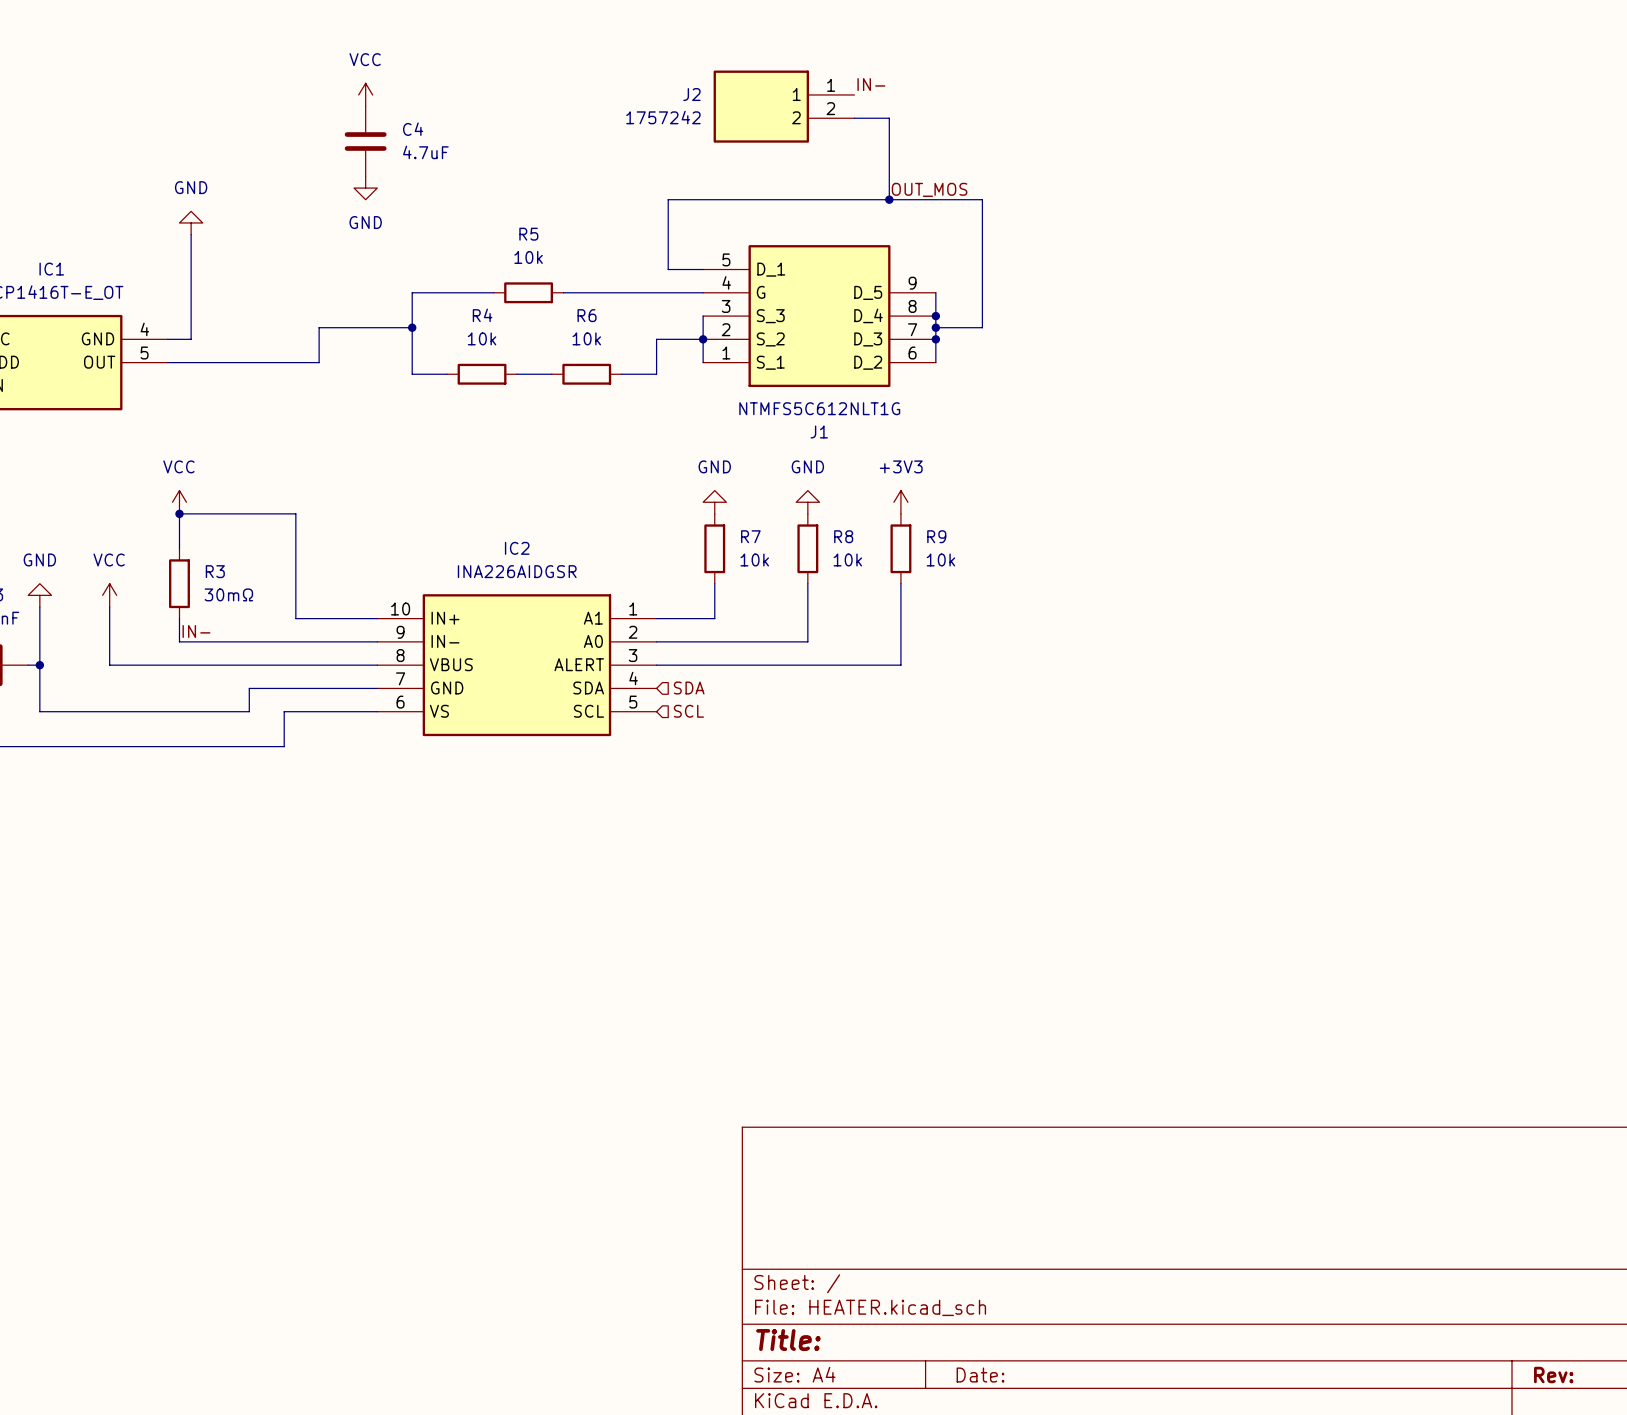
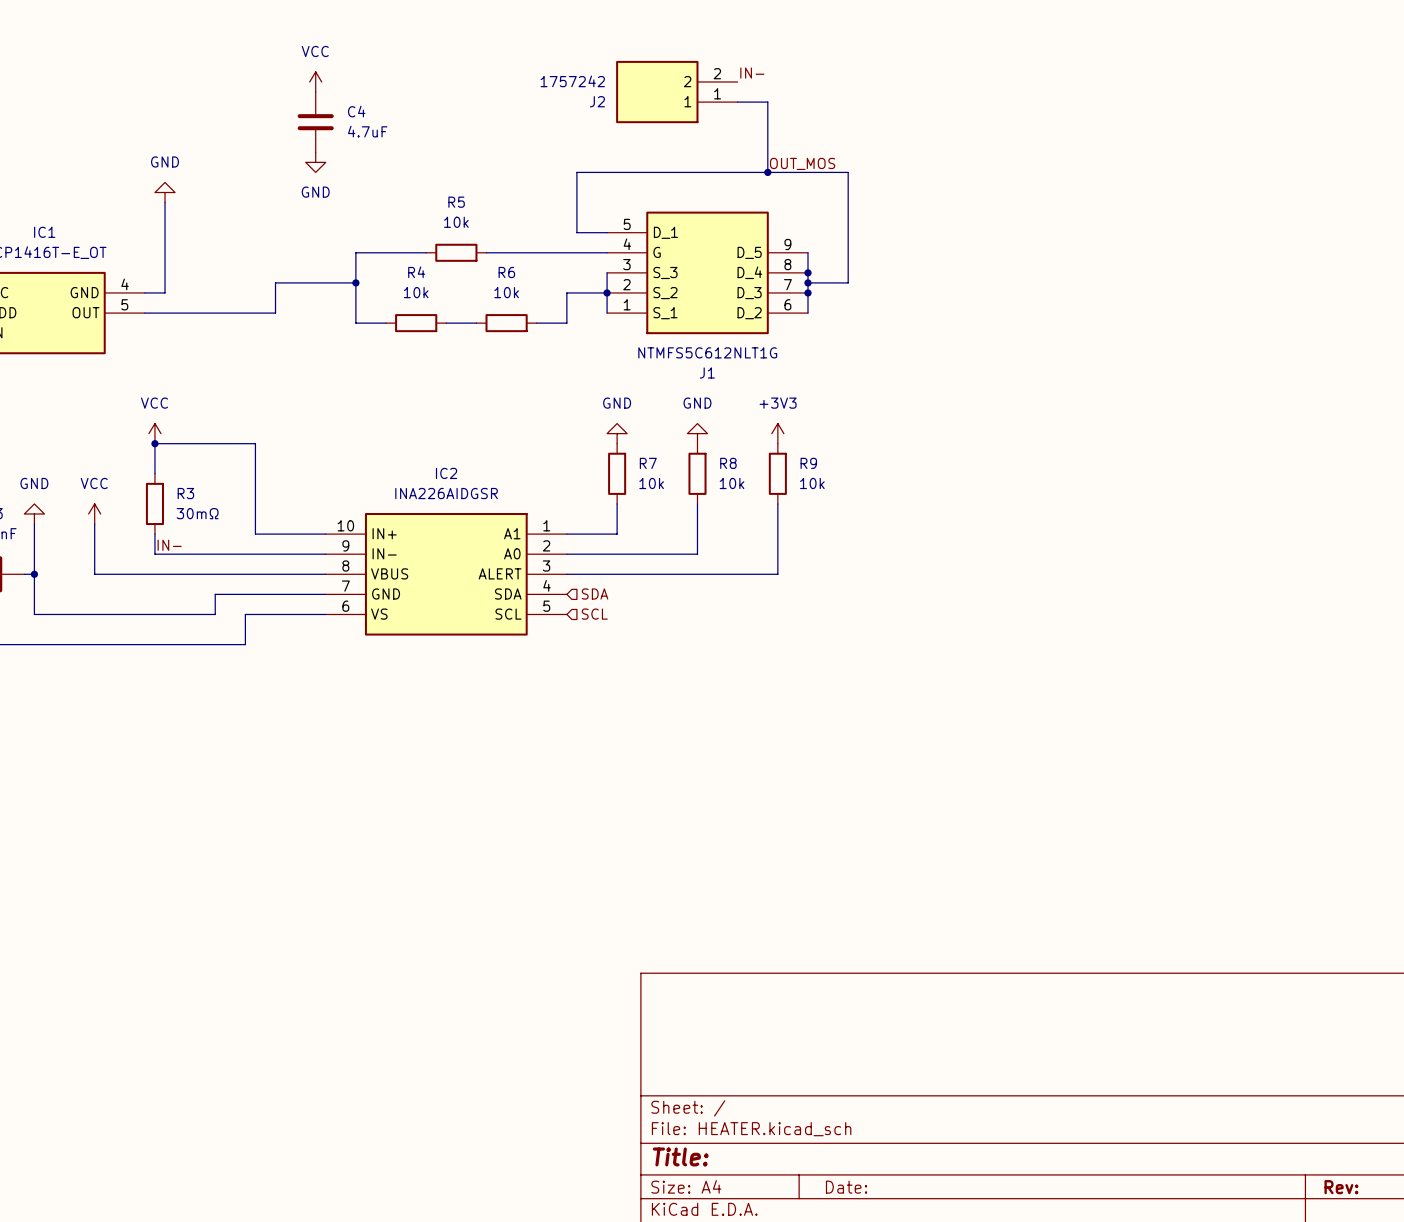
J2 flip: as is (761, 106) -> up-down (657, 92)

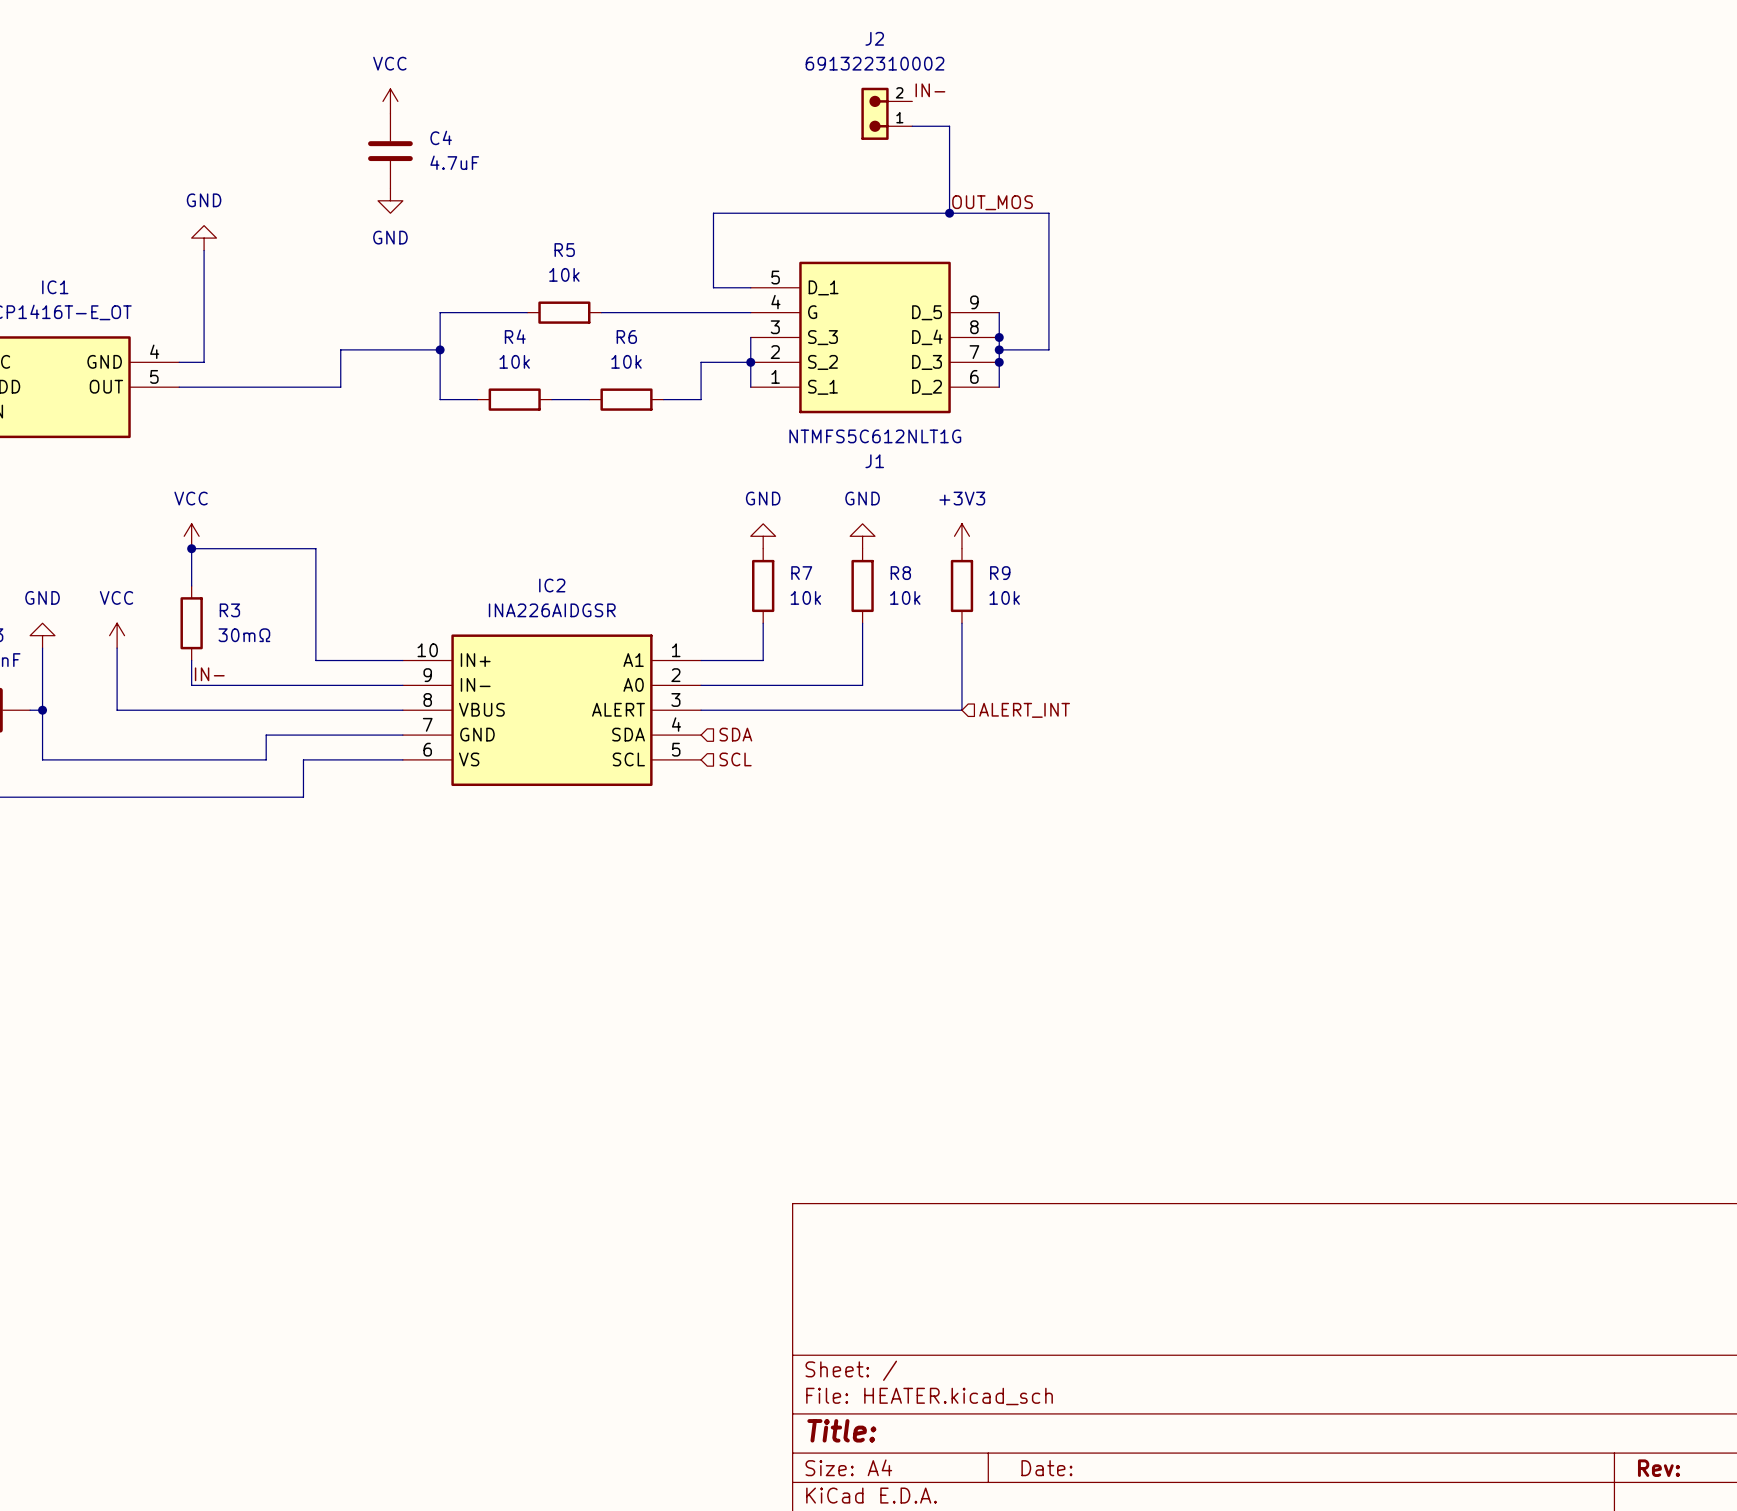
J2 symbol: [616, 60, 738, 124] -> [861, 87, 913, 140]
J2 value: 1757242 (572, 81) -> 691322310002 (875, 63)
J2 name position: J2 (597, 101) -> J2 (874, 38)
hierarchical label: none -> ALERT_INT (1024, 710)

